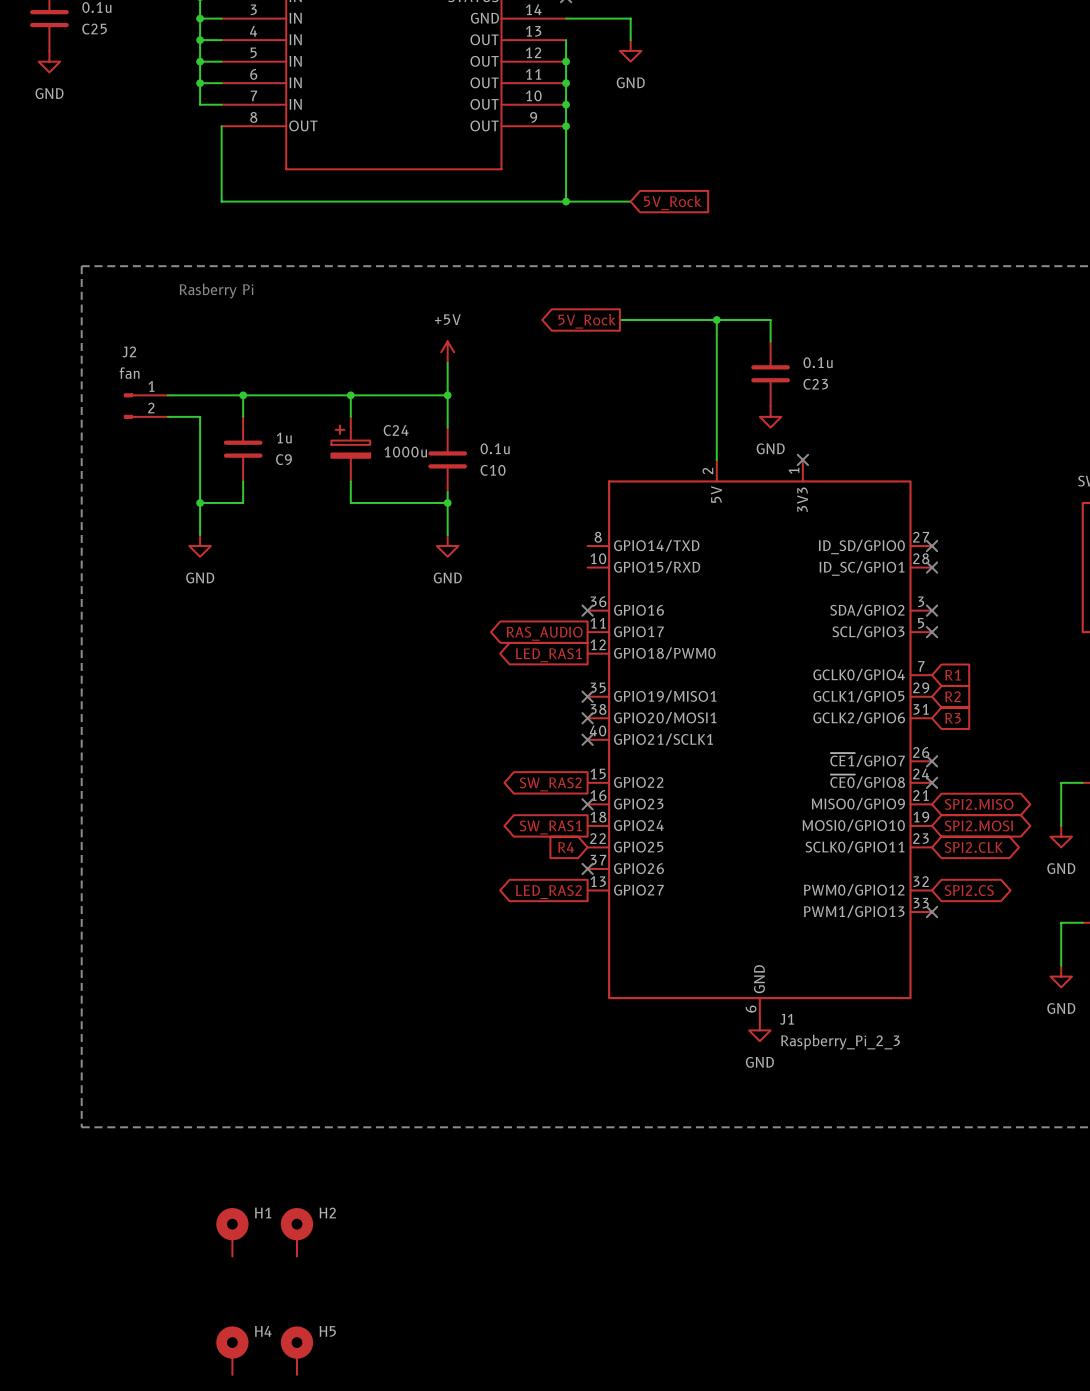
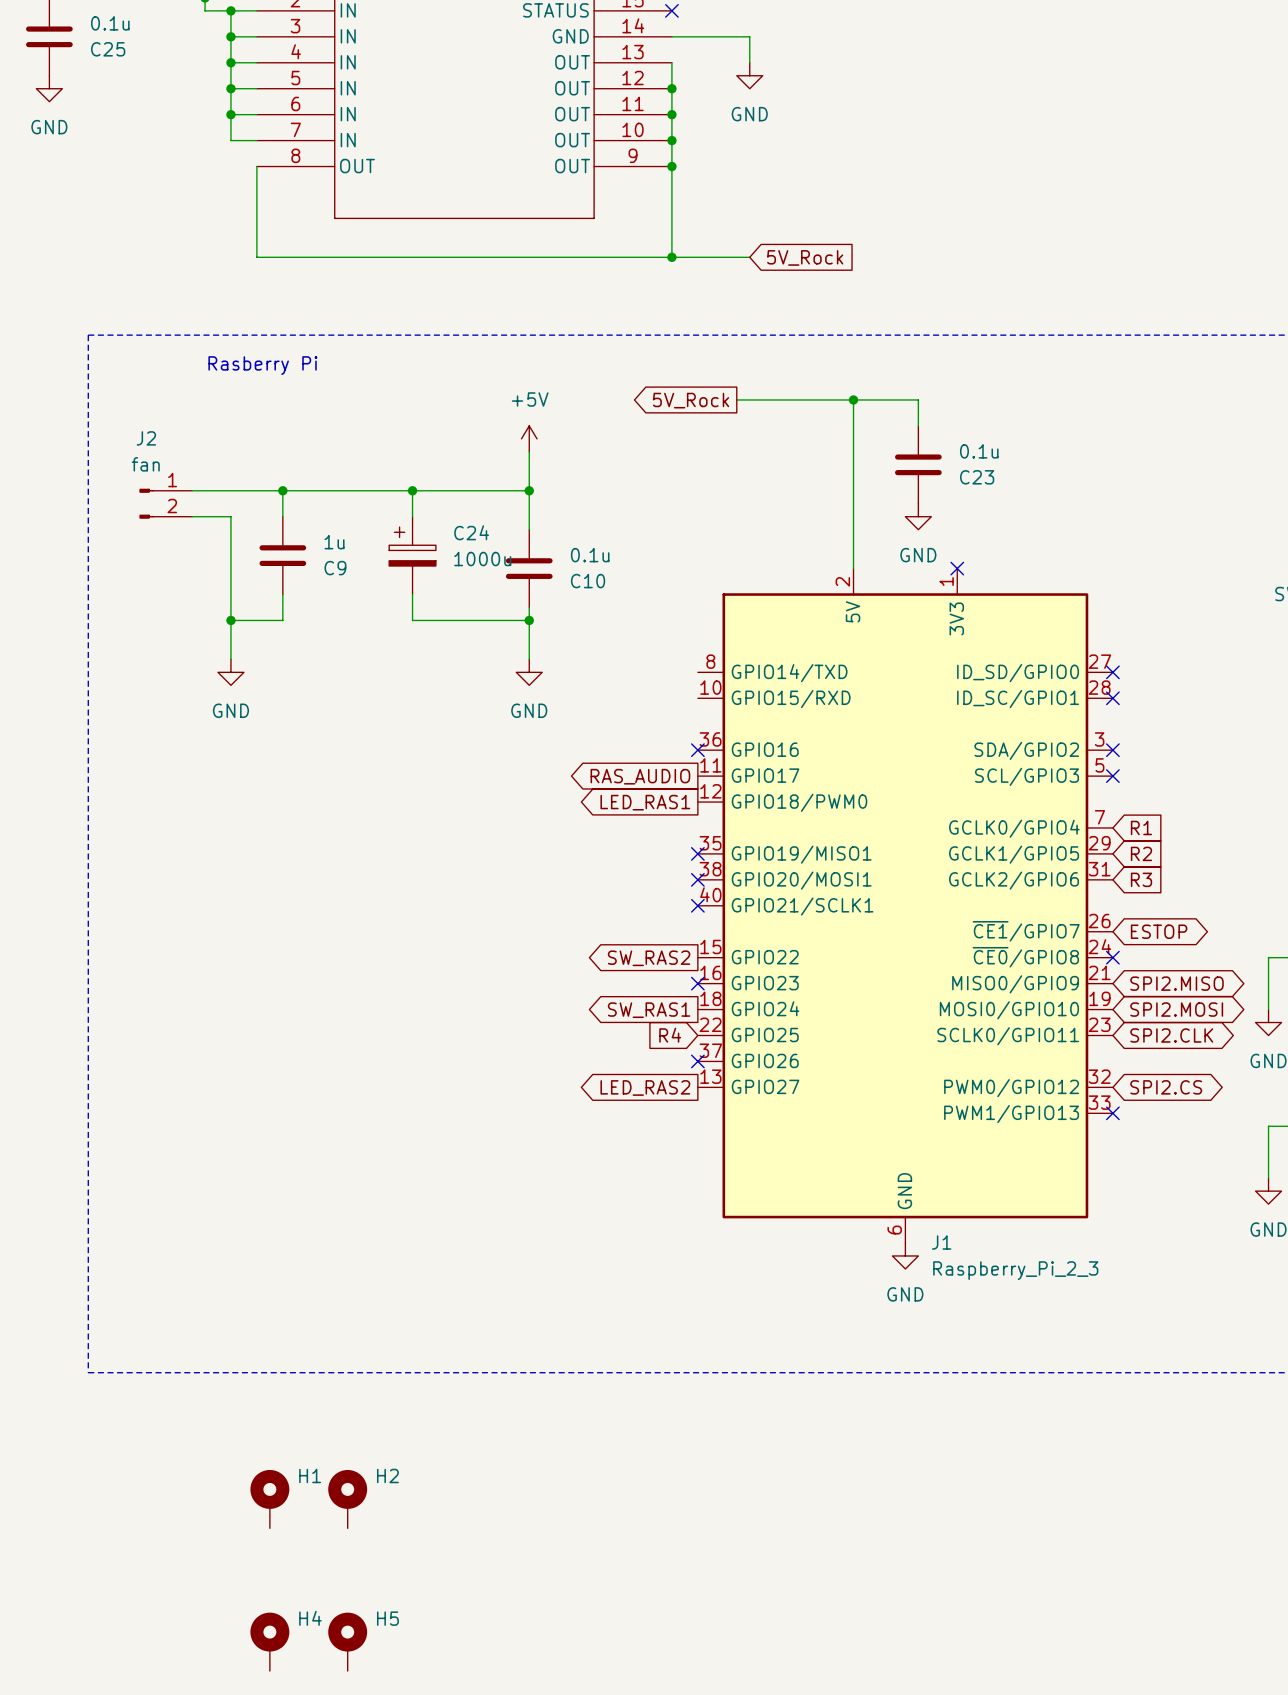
no-connect mark: (932, 761) -> none
global label: none -> ESTOP (1159, 931)

